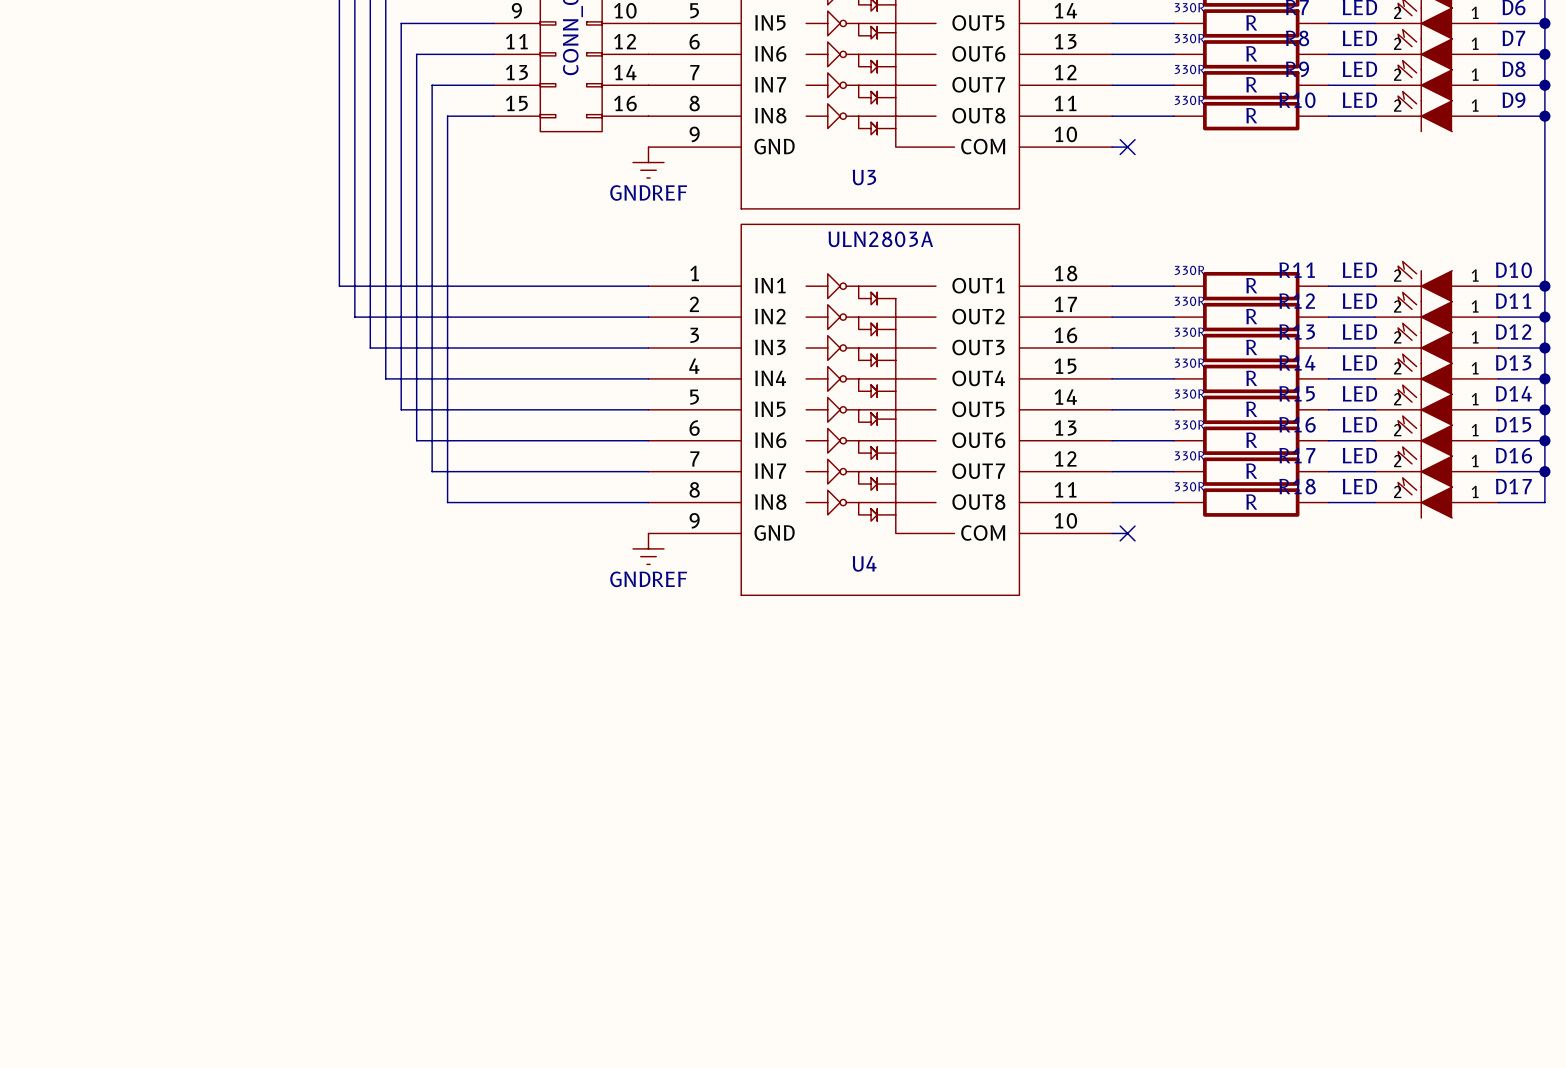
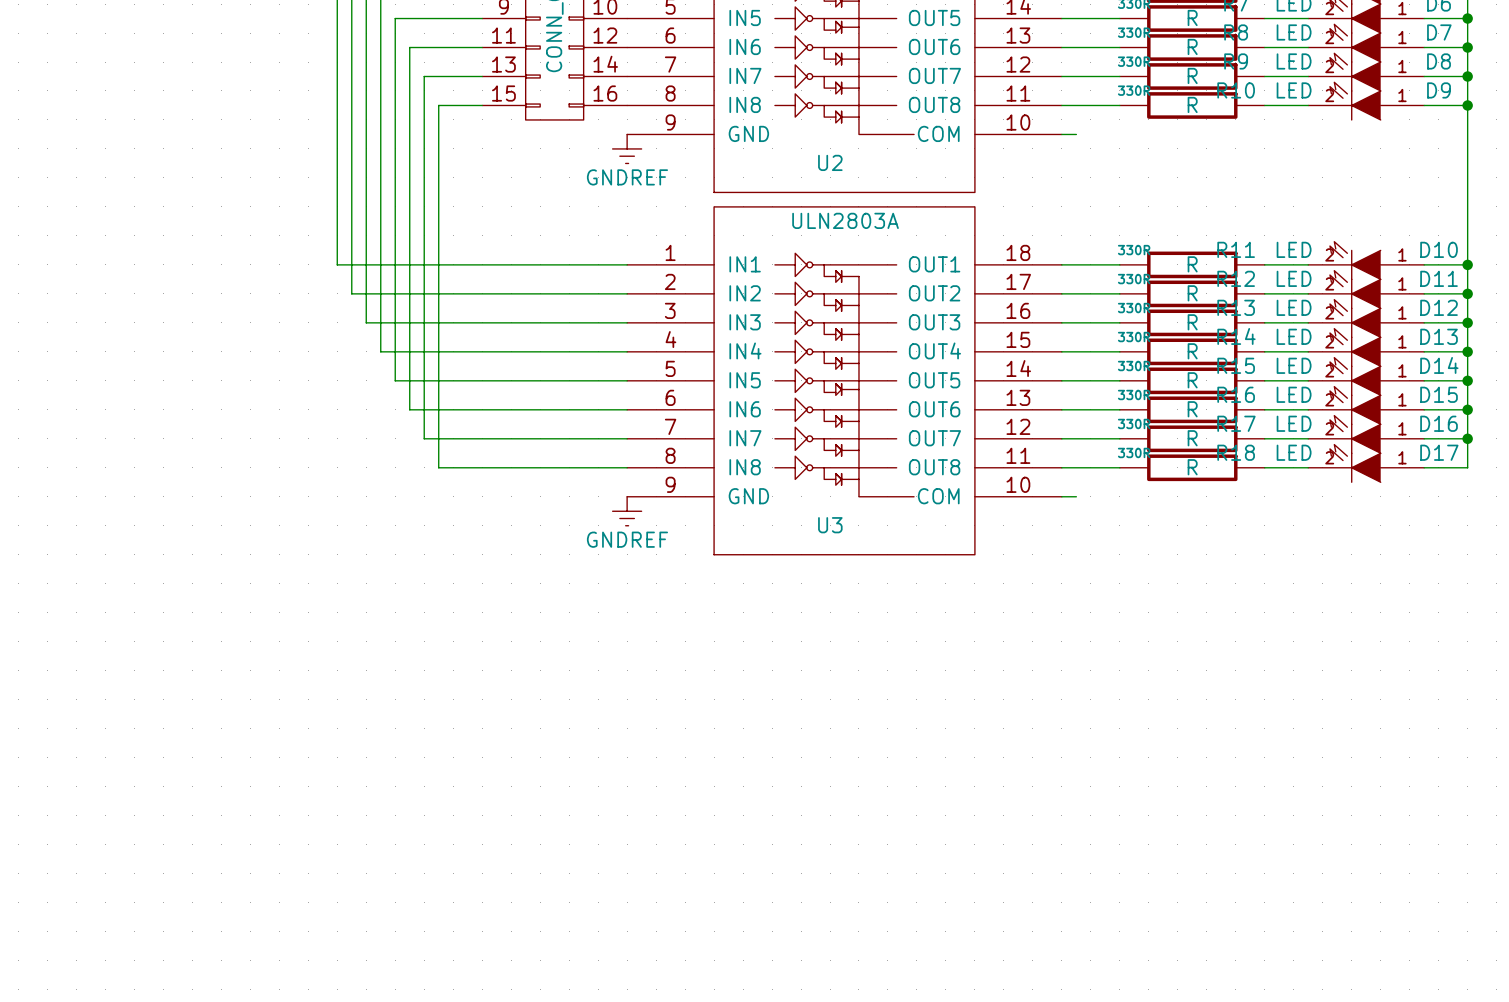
no-connect mark: (1127, 147) -> none
U3 name: U3 (864, 177) -> U2 (830, 162)
no-connect mark: (1127, 533) -> none
U4 name: U4 (864, 563) -> U3 (830, 525)

